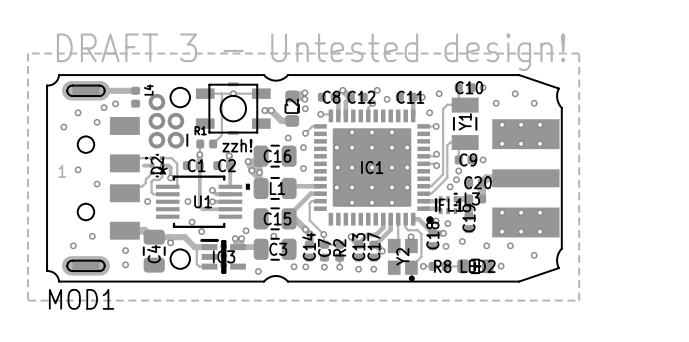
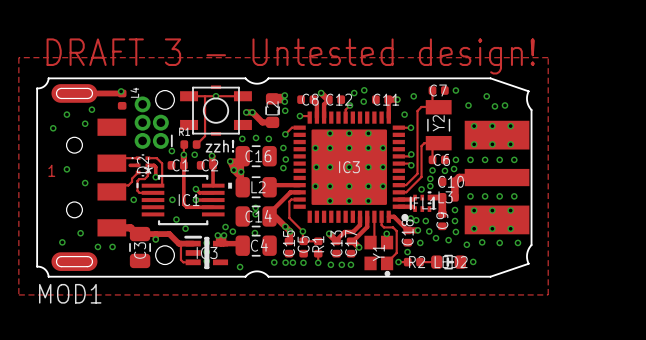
via: none -> (364, 90)
C10 name: C10 (469, 87) -> C7 (438, 90)
via position: (115, 103) -> (121, 91)
via: none -> (494, 106)
Y1 name: Y1 (465, 121) -> Y2 (438, 123)
via: none -> (256, 137)
via: none -> (242, 138)
via: none -> (171, 151)
via: none -> (194, 154)
via: none -> (285, 159)
C9 name: C9 (468, 159) -> C6 (441, 159)
via: none -> (470, 159)
via: none -> (485, 159)
via: none -> (499, 159)
via: none -> (514, 159)
IC1 name: IC1 (372, 167) -> IC3 (349, 167)
via: none -> (454, 169)
via: none -> (444, 170)
C20 name: C20 (477, 182) -> C10 (450, 181)
line: none -> (137, 183) (137, 187)
via: (450, 186) -> none
via: none -> (430, 186)
L1 name: L1 (277, 188) -> L2 (258, 187)
via: none -> (421, 189)
via: none -> (470, 196)
via: none -> (485, 196)
via: none -> (499, 196)
via: none -> (514, 196)
U1 name: U1 (203, 201) -> IC1 (189, 200)
via: none -> (255, 207)
via: none -> (454, 210)
via: none -> (255, 214)
C15 name: C15 (277, 218) -> C14 (258, 216)
C19 name: C19 (468, 218) -> C9 (442, 220)
via: none -> (416, 220)
via: (447, 223) -> none
via: none -> (425, 221)
via: none -> (454, 221)
via: none -> (225, 227)
via: (246, 230) -> none
via: none -> (232, 231)
via: none -> (429, 231)
via: none -> (455, 231)
via: none -> (448, 240)
via: (486, 245) -> none
C14 name: C14 (309, 246) -> C15 (289, 243)
via: none -> (499, 242)
via: none -> (517, 242)
C7 name: C7 (324, 247) -> C5 (303, 244)
R2 name: R2 (339, 247) -> R1 (318, 244)
via: none -> (466, 244)
C3 name: C3 (278, 249) -> C4 (259, 245)
C4 name: C4 (153, 254) -> C3 (140, 250)
via: none -> (407, 252)
via: (534, 255) -> none
Y2 name: Y2 (402, 256) -> Y1 (378, 252)
via position: (125, 264) -> (97, 246)
via: none -> (292, 262)
R8 name: R8 (442, 266) -> R2 (417, 262)
via: none -> (330, 264)
via: (358, 269) -> none
via: none -> (341, 264)

